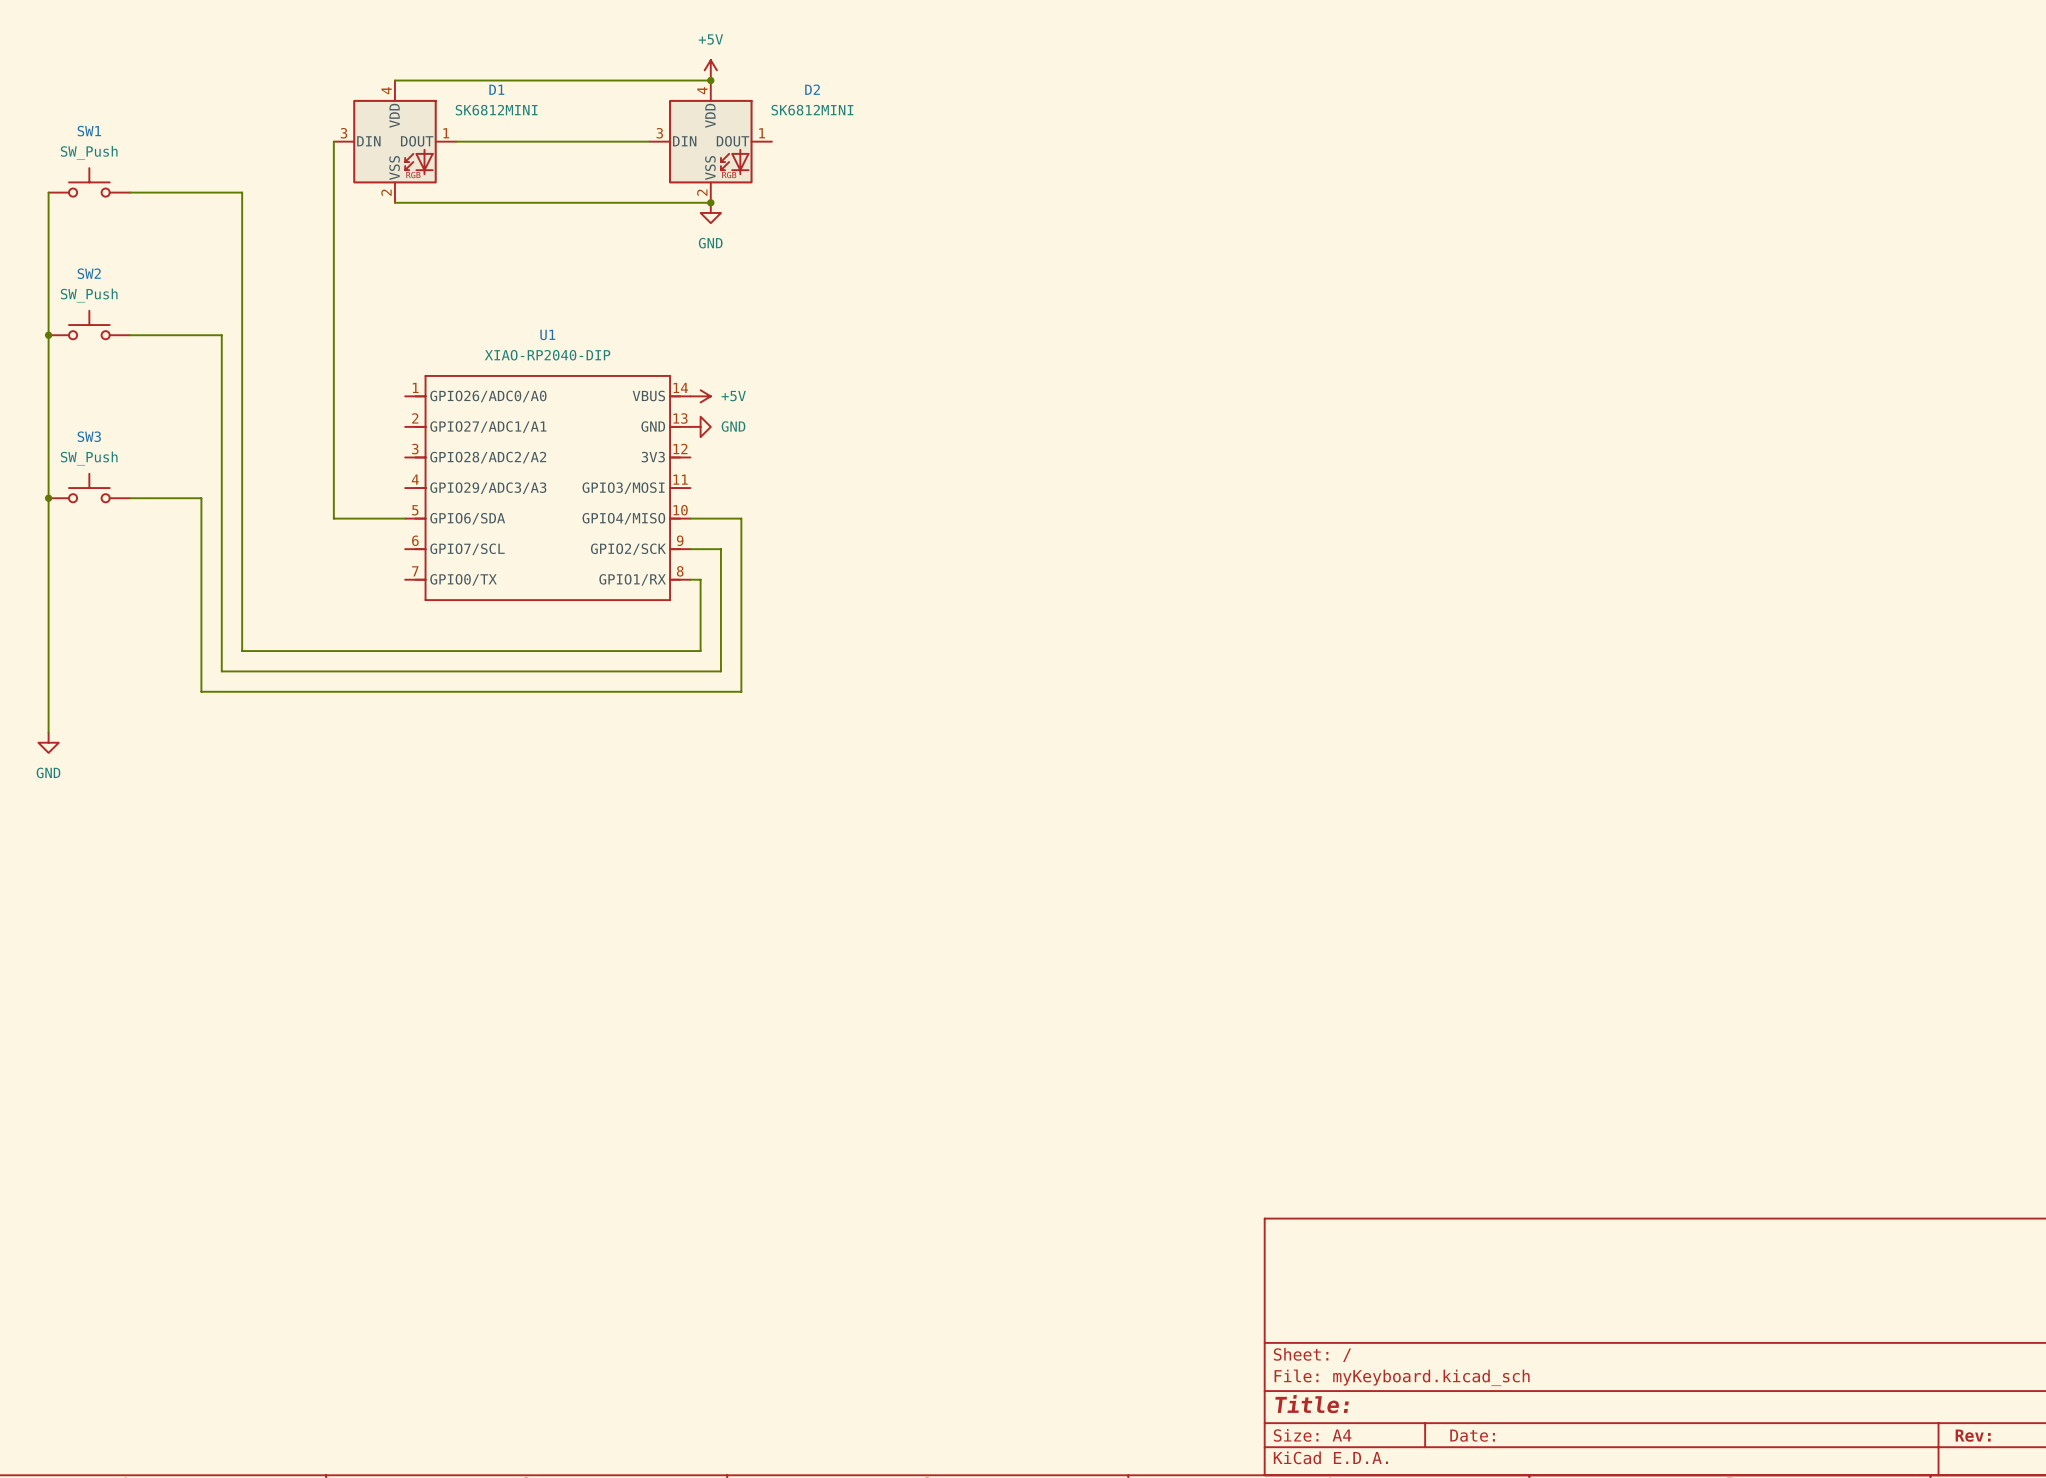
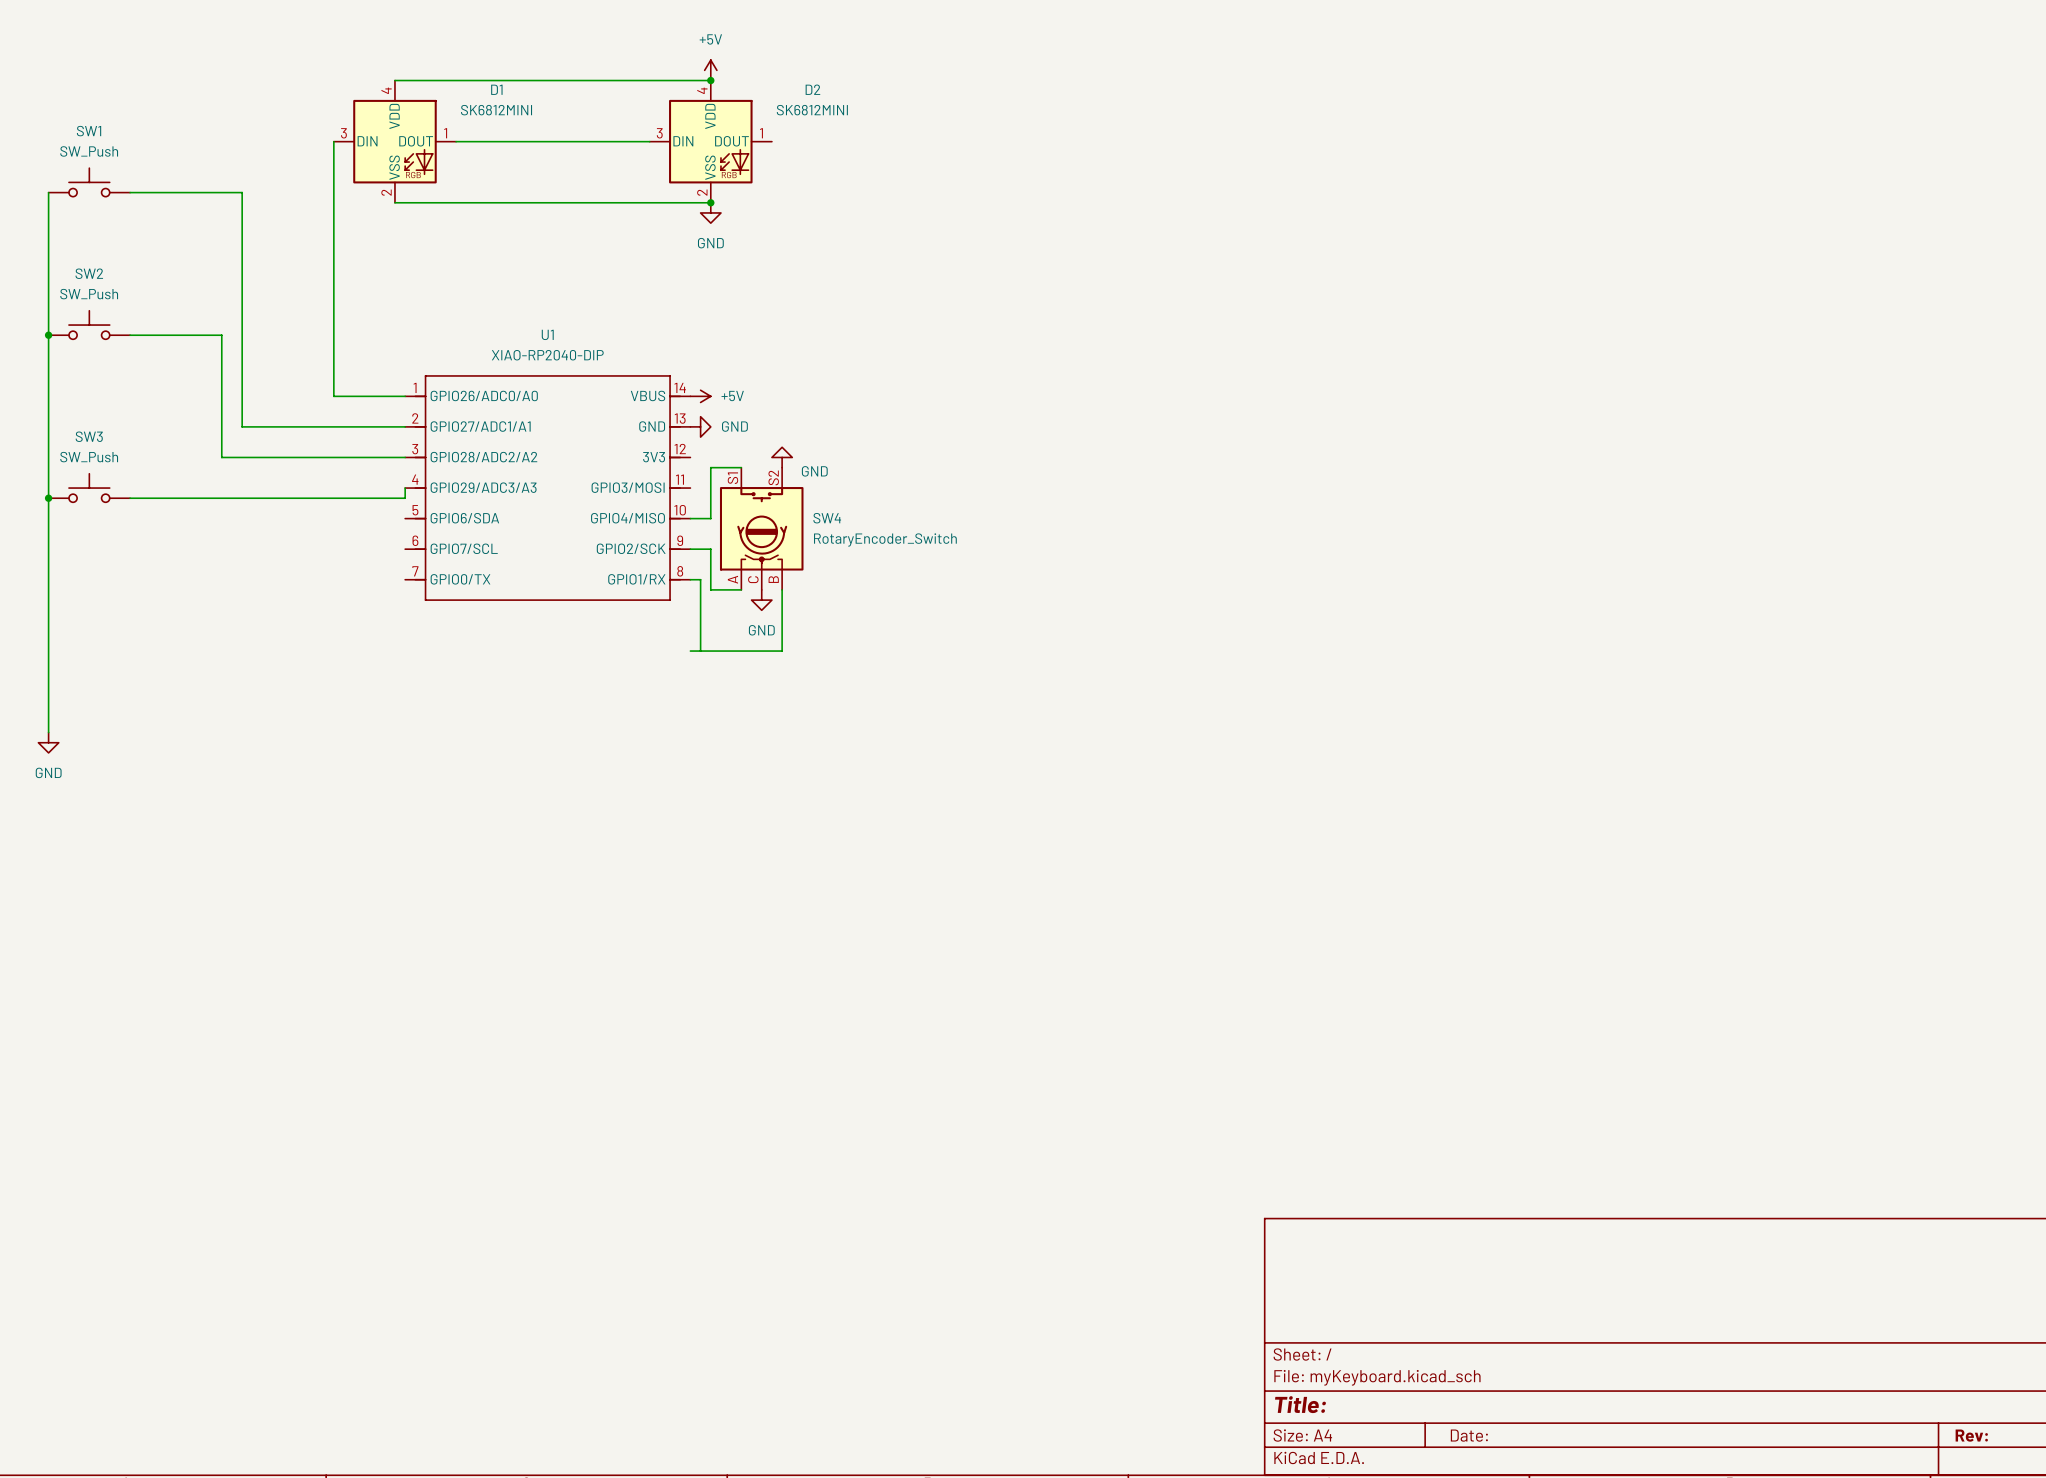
wire: (333, 396) (333, 518) (405, 518) -> (333, 396) (405, 396)
wire: (242, 426) (242, 651) (690, 651) -> (242, 426) (405, 426)
wire: (221, 457) (221, 671) (720, 671) (720, 549) (710, 549) -> (221, 457) (405, 457)
power symbol: none -> GND (782, 457)
wire: none -> (741, 467) (710, 467) (710, 518)
wire: (201, 498) (201, 691) (741, 691) (741, 518) (710, 518) -> (201, 498) (405, 498) (405, 488)
SW4: none -> RotaryEncoder_Switch (761, 528)
wire: none -> (710, 549) (710, 589) (741, 589)
wire: none -> (782, 589) (782, 651) (700, 651)
power symbol: none -> GND (761, 600)

